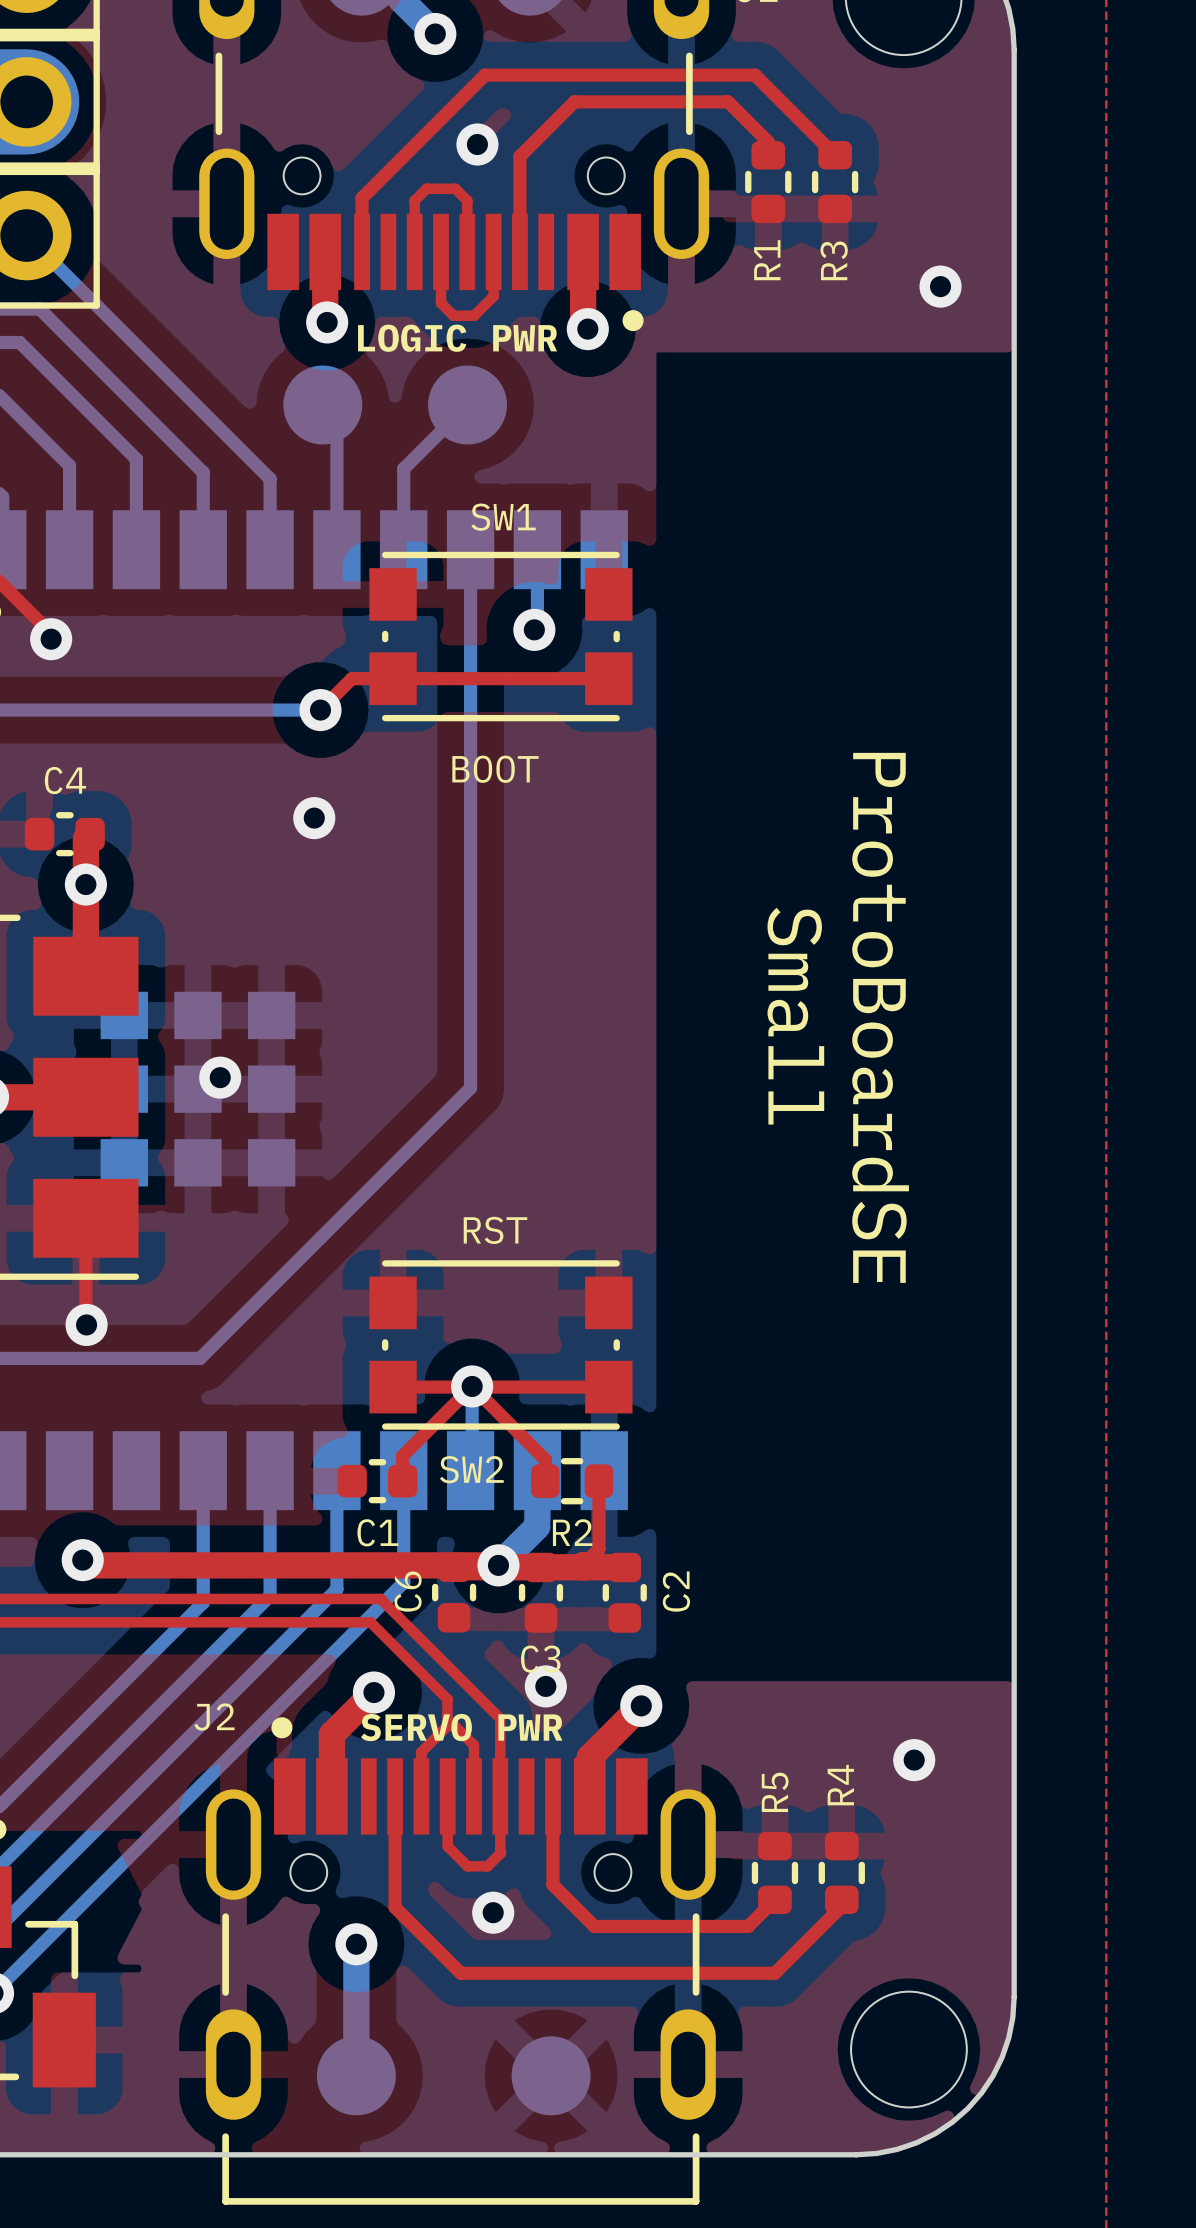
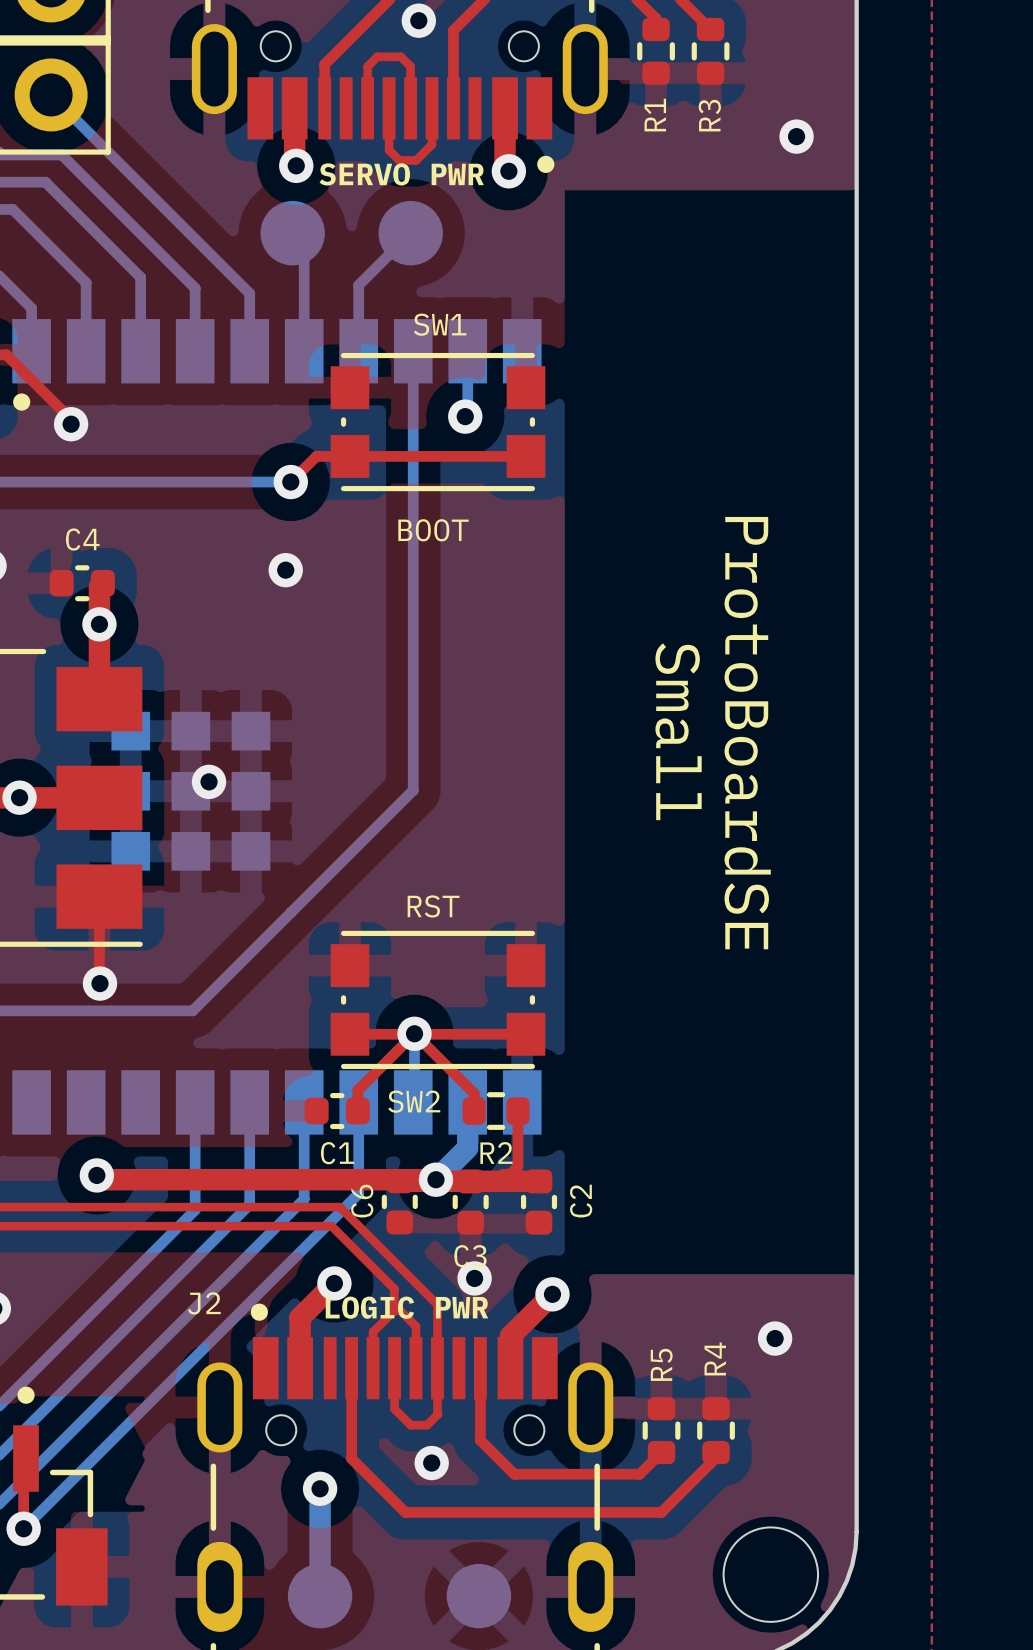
text: LOGIC PWR (457, 338) -> SERVO PWR (401, 174)
text: SERVO PWR (461, 1727) -> LOGIC PWR (406, 1307)

